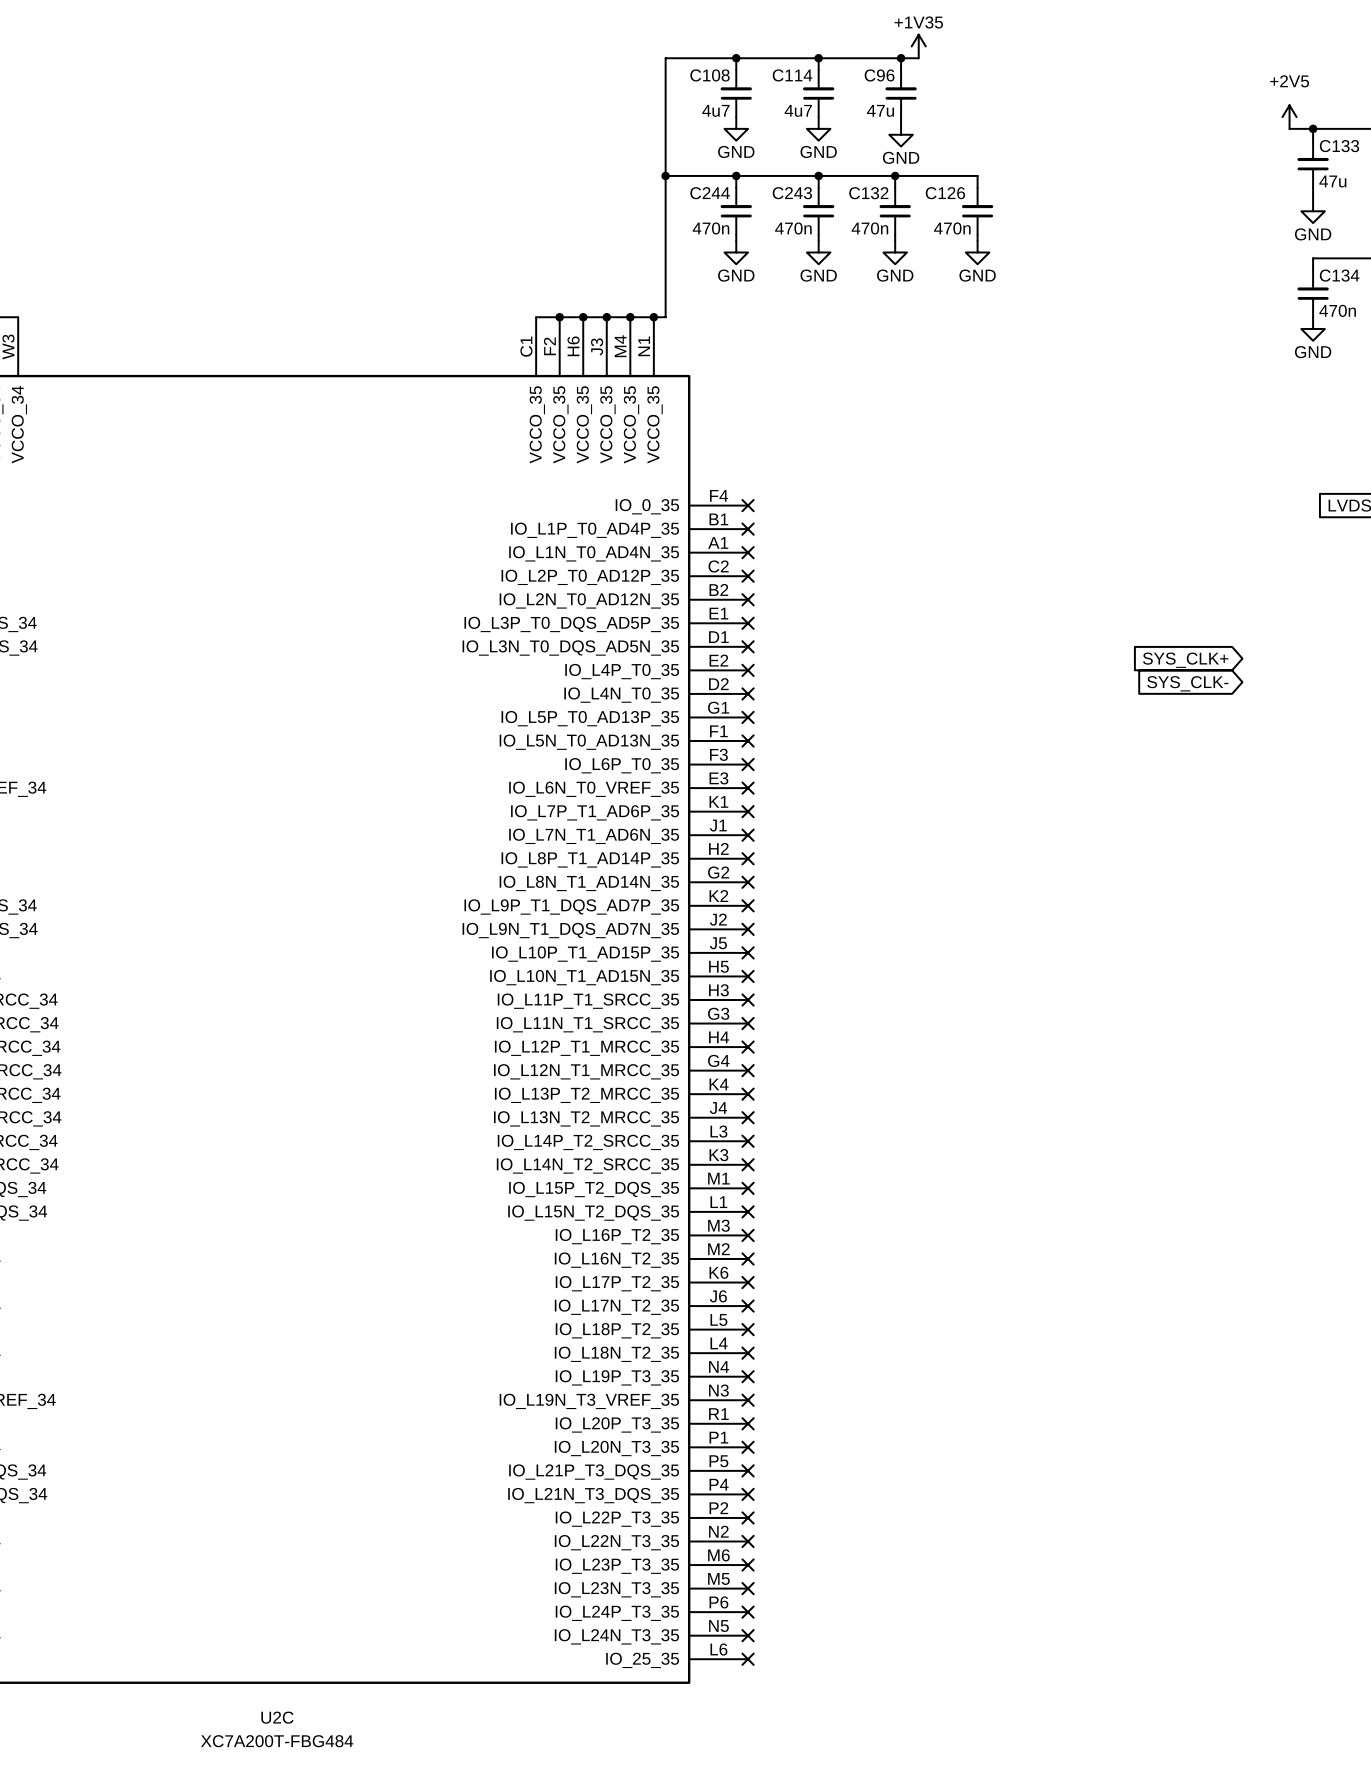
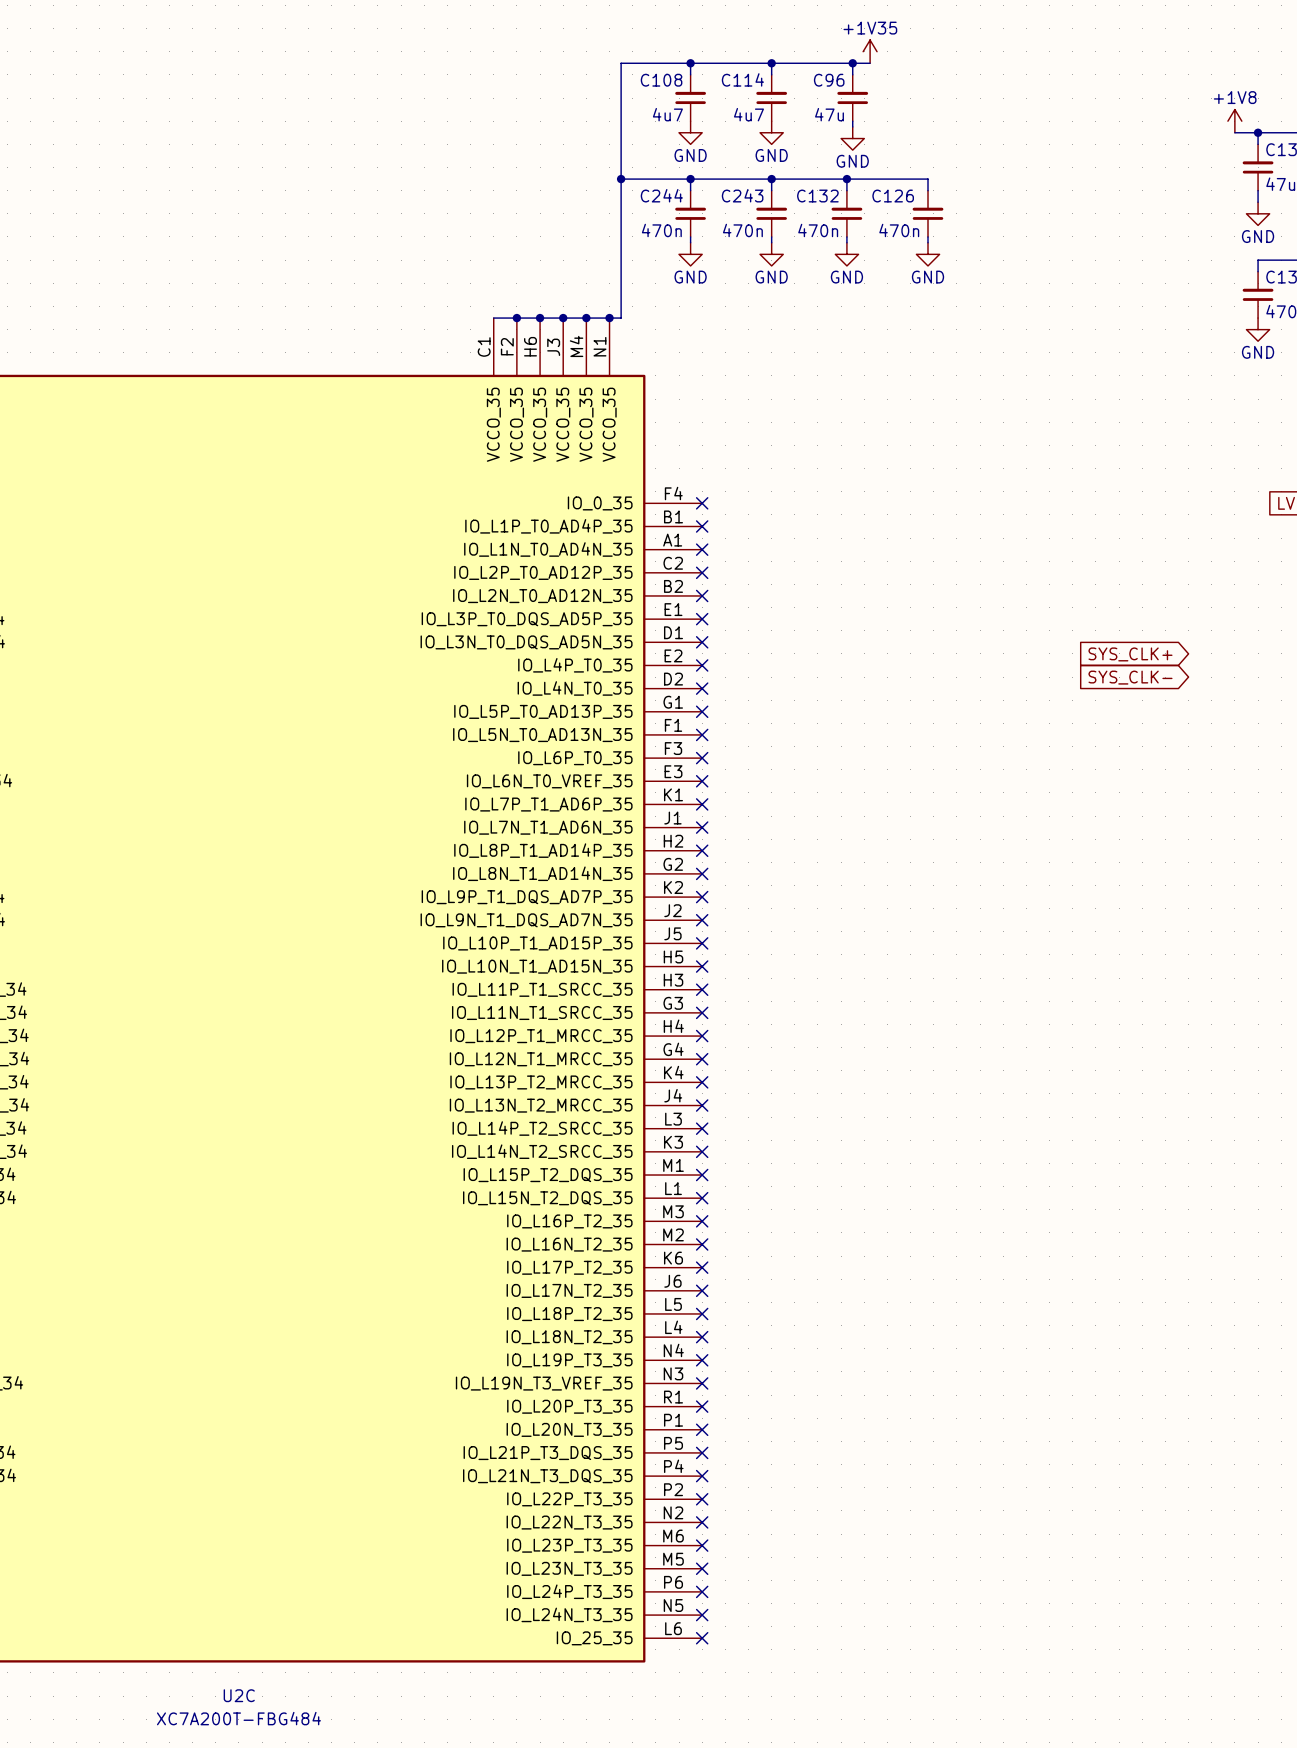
power symbol: +2V5 (1289, 117) -> +1V8 (1234, 121)

